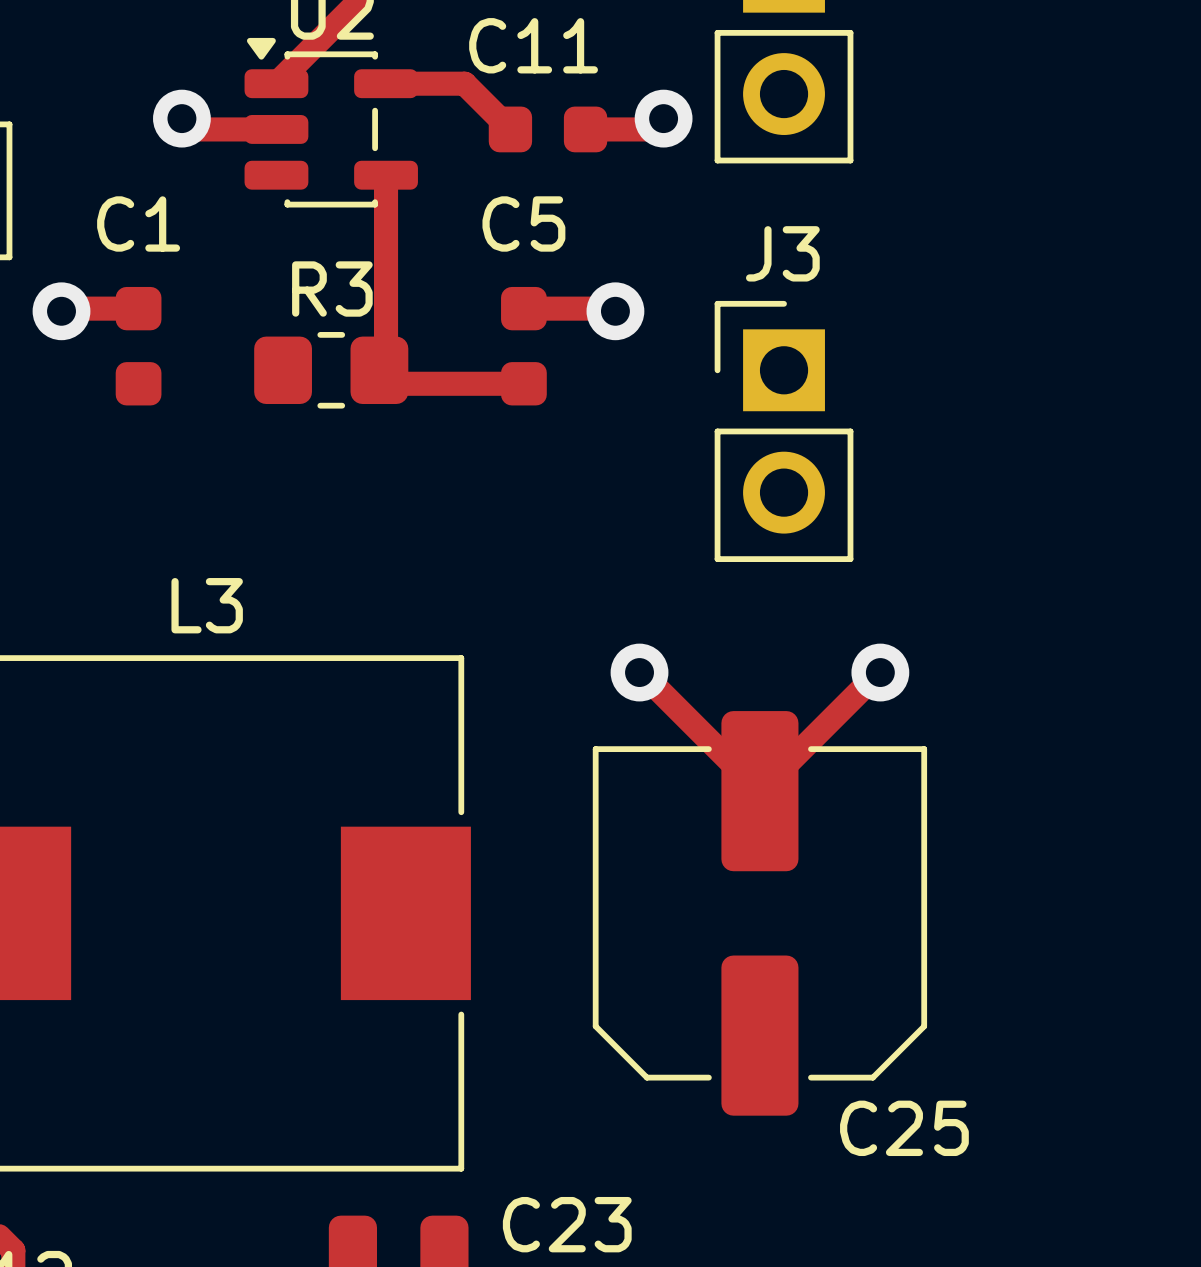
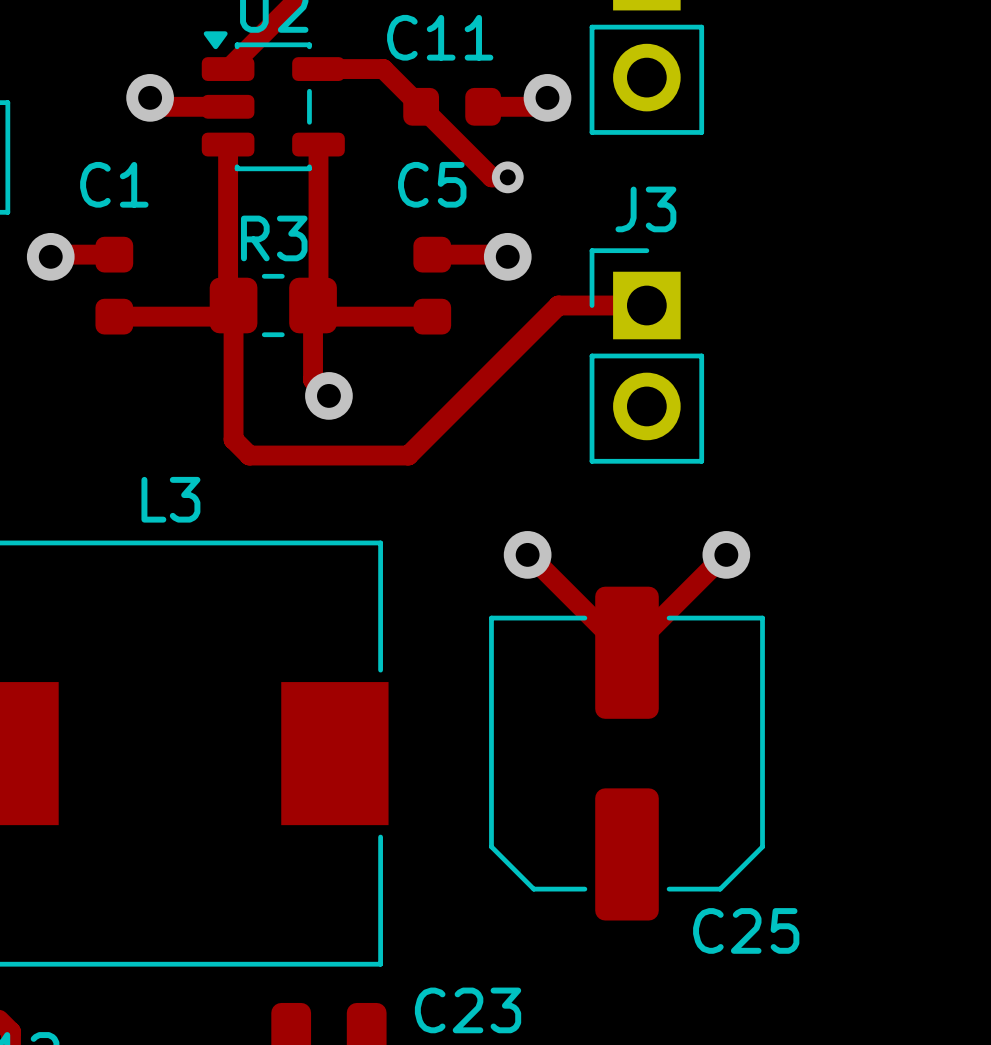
track: none -> (421, 106) (491, 177) (507, 177)
track: none -> (228, 144) (228, 300) (233, 305)
via: none -> (507, 177)
track: none -> (233, 305) (233, 439) (249, 455) (408, 455) (558, 305) (646, 305)
track: none -> (233, 305) (222, 316) (114, 316)
track: none -> (313, 305) (313, 380) (328, 395)
via: none -> (328, 395)

